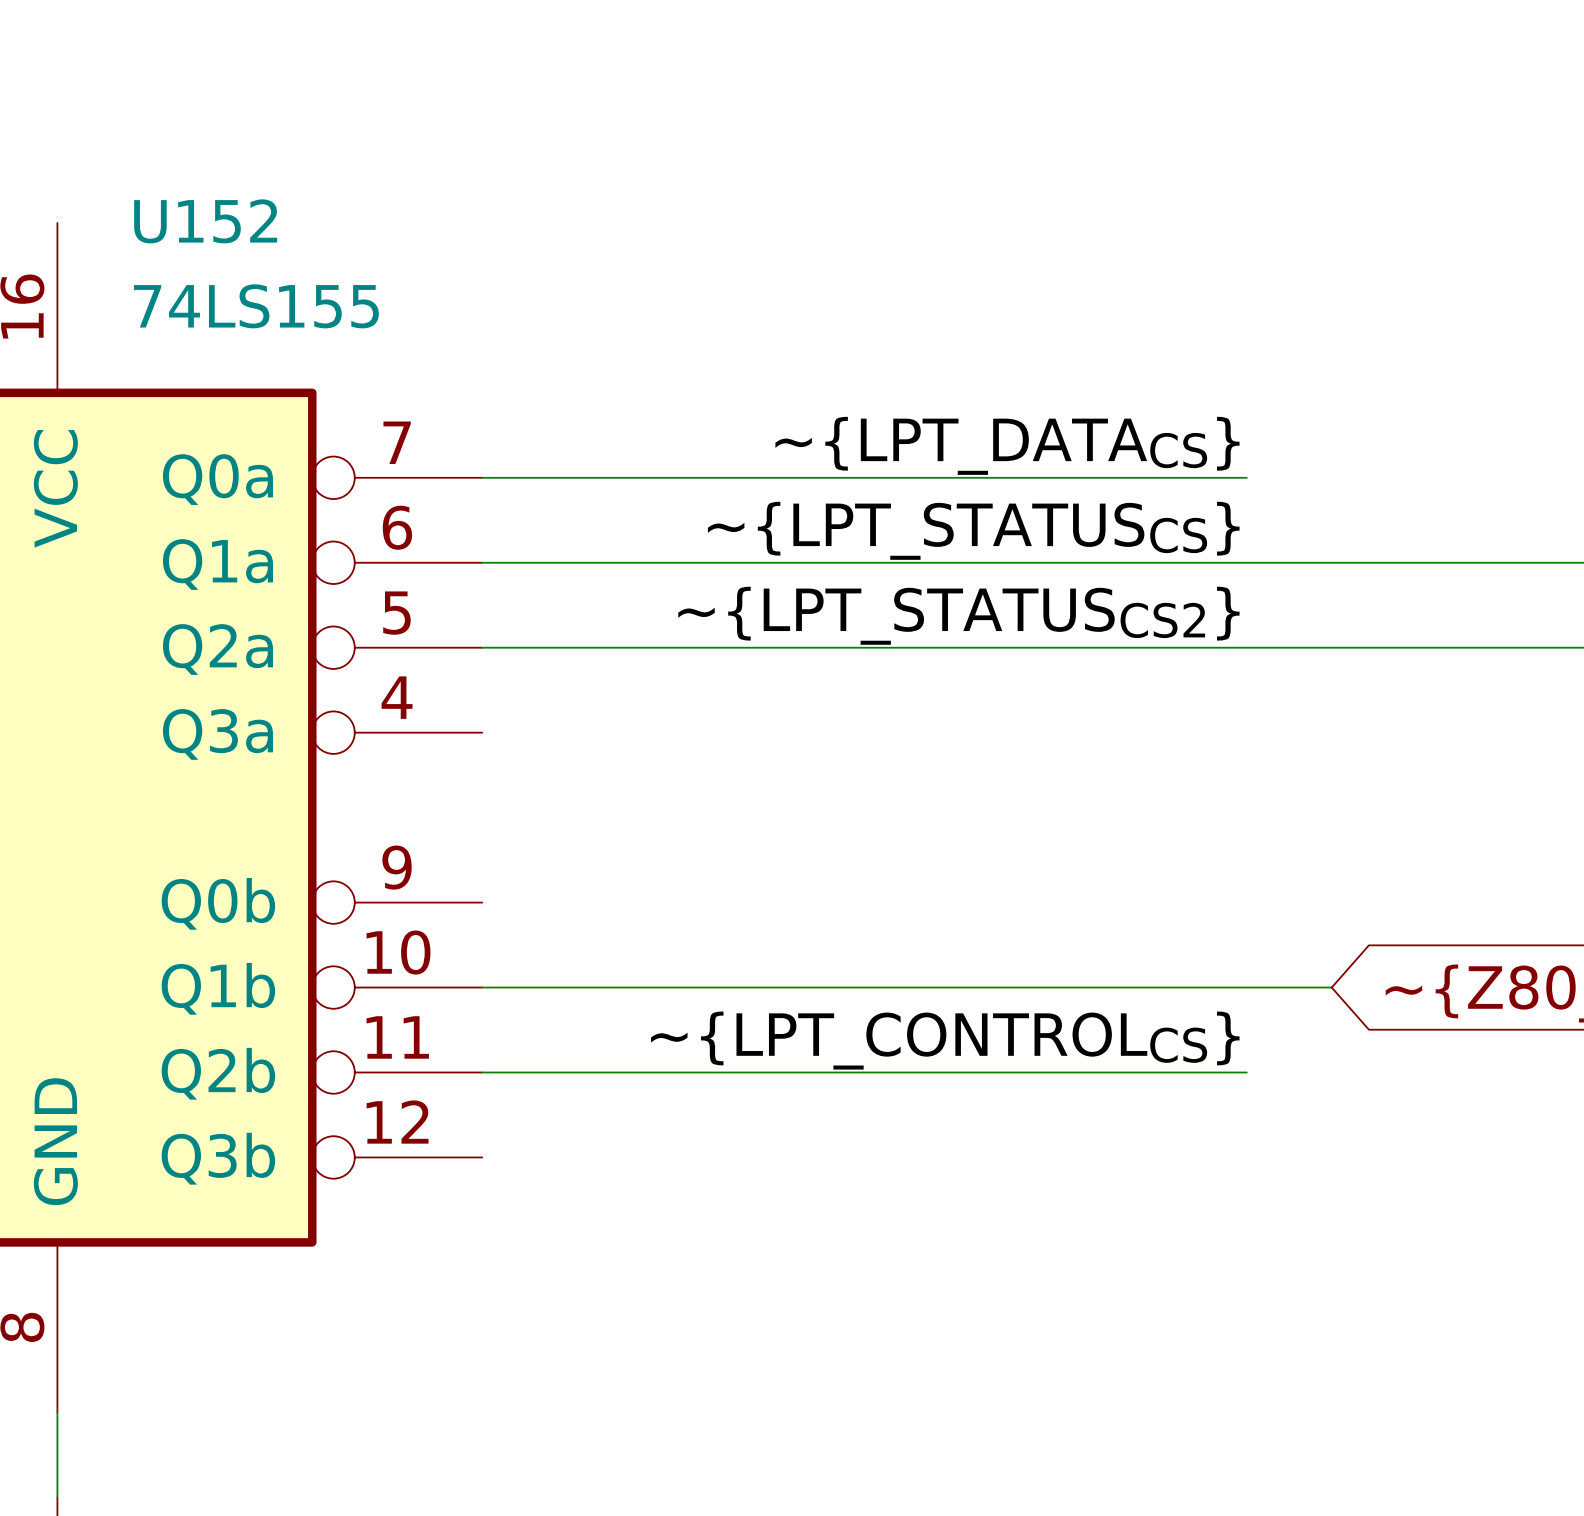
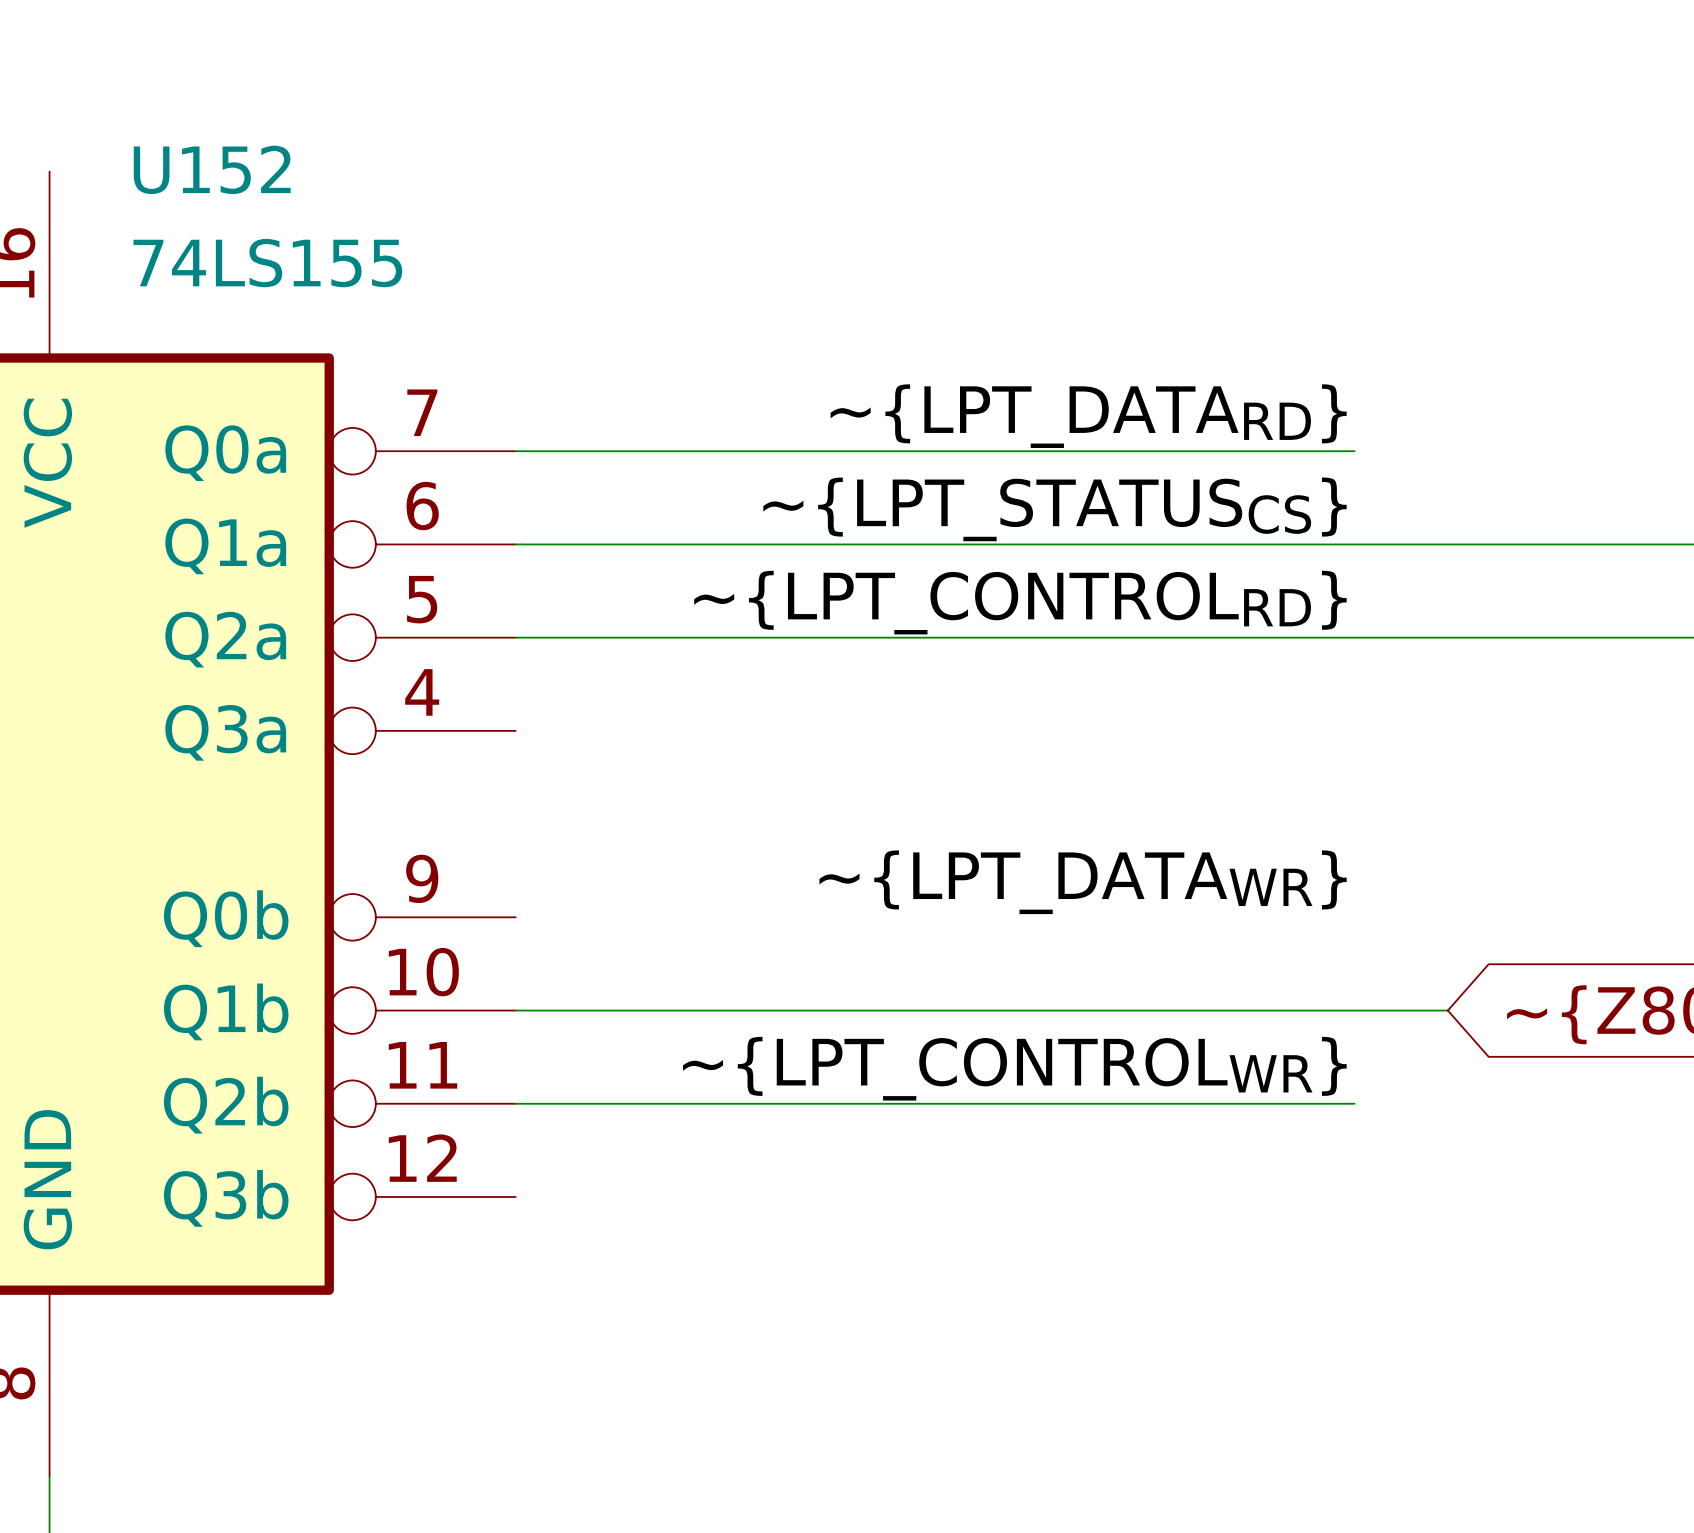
label: ~{LPT_DATACS} (1007, 445) -> ~{LPT_DATARD} (1088, 416)
label: ~{LPT_STATUSCS2} (958, 615) -> ~{LPT_CONTROLRD} (1020, 602)
label: none -> ~{LPT_DATAWR} (1083, 882)
label: ~{LPT_CONTROLCS} (945, 1040) -> ~{LPT_CONTROLWR} (1014, 1068)

